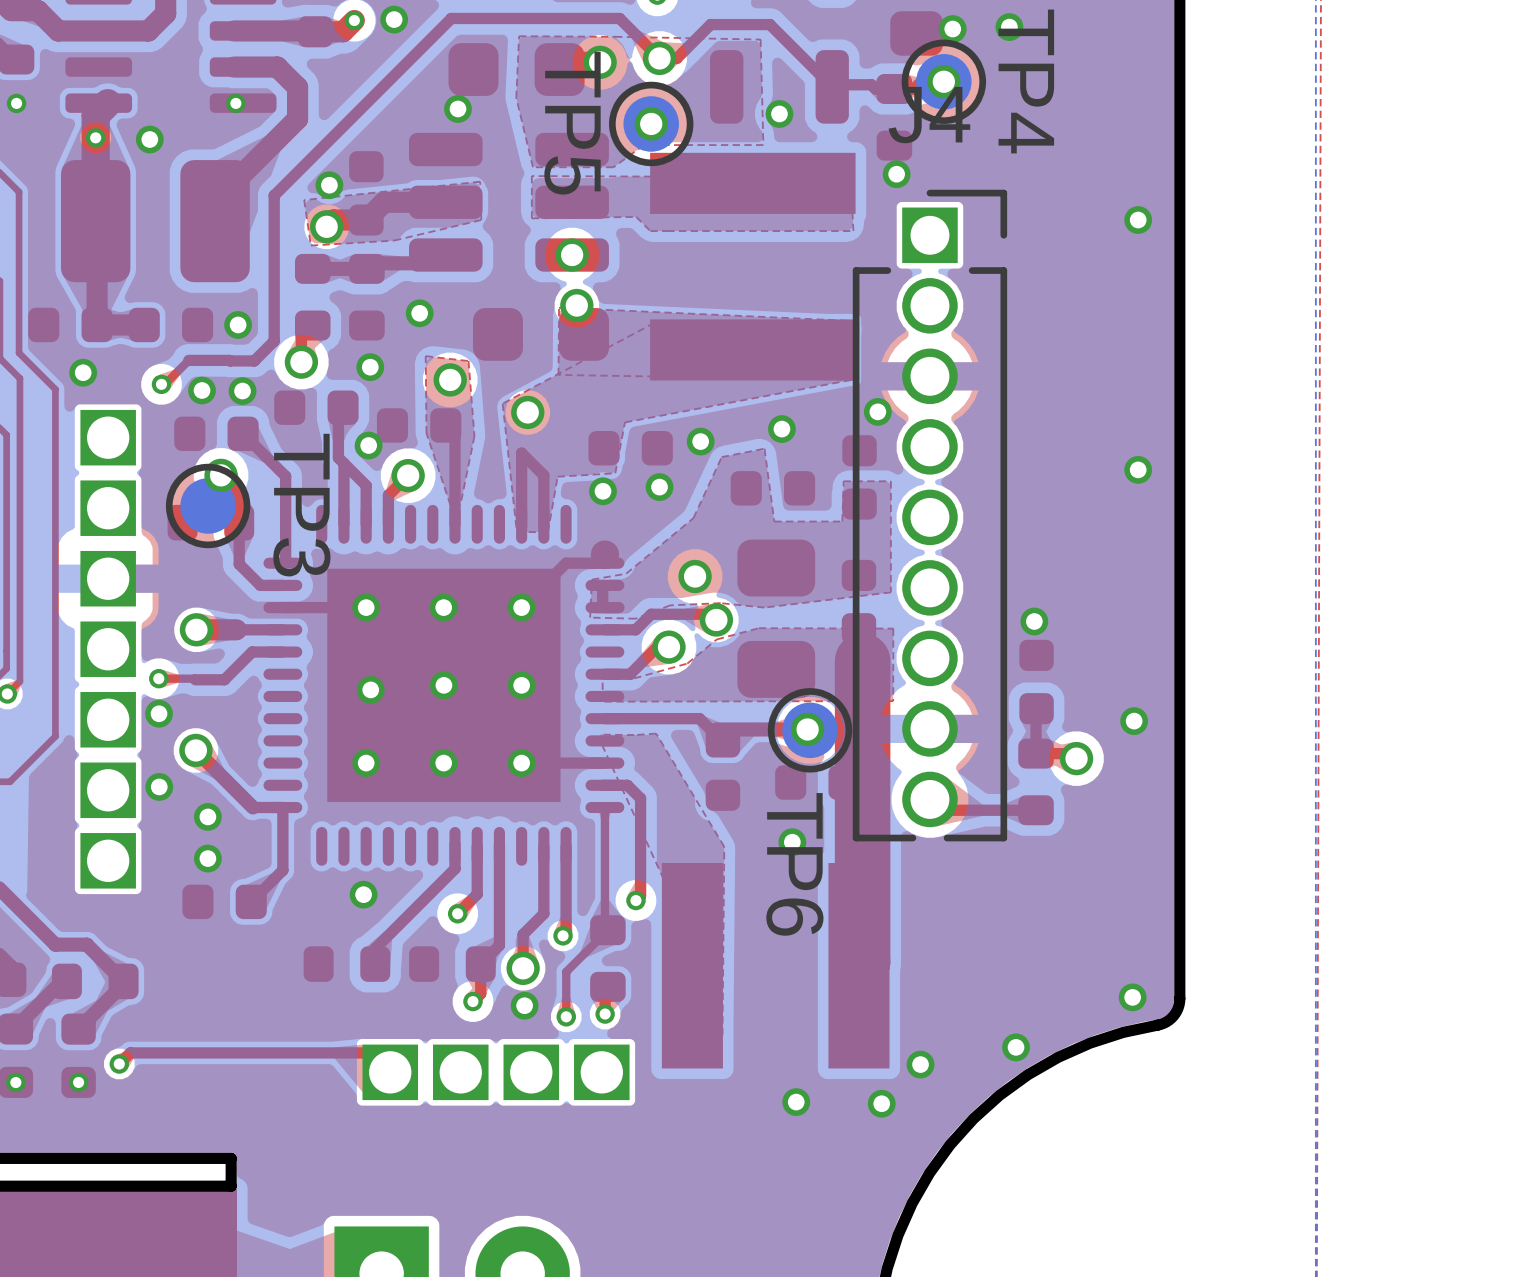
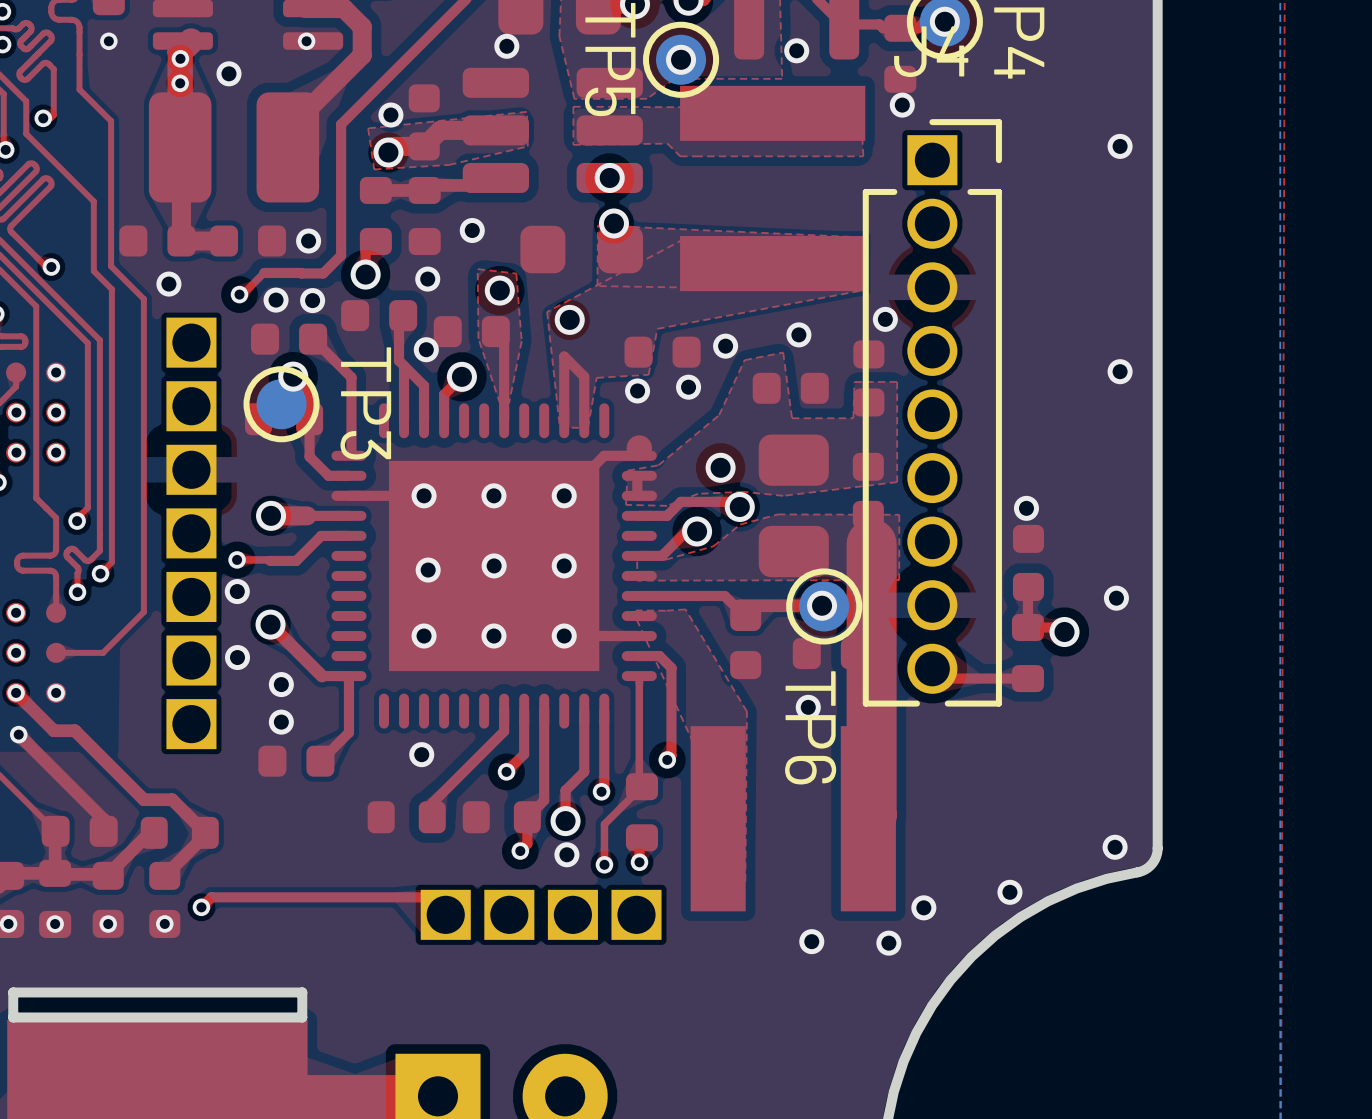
via: none -> (180, 58)
via: (95, 137) -> none
via: none -> (180, 83)

